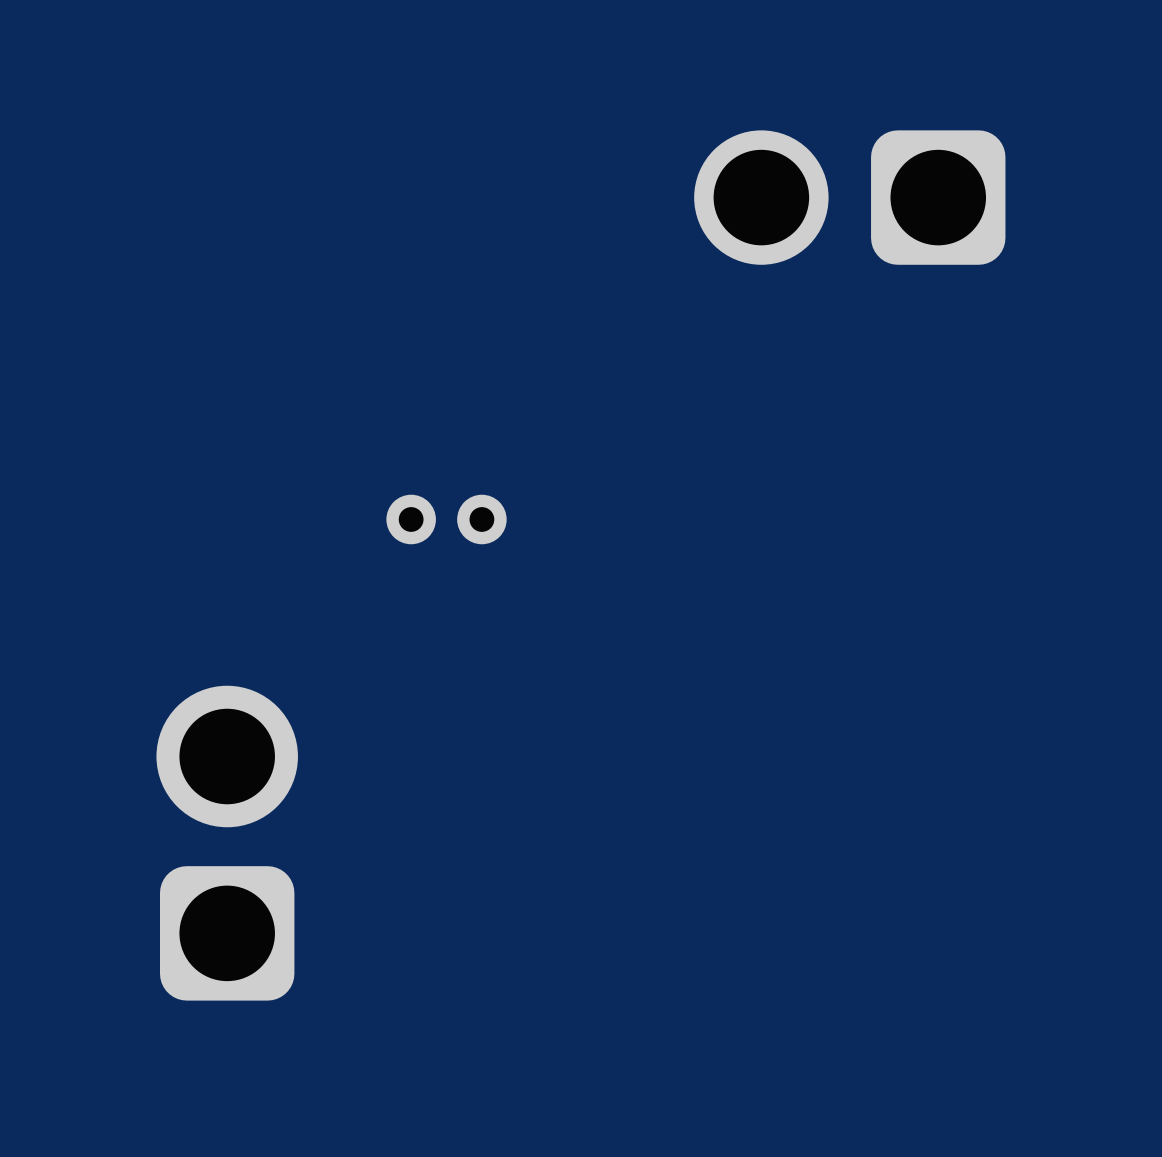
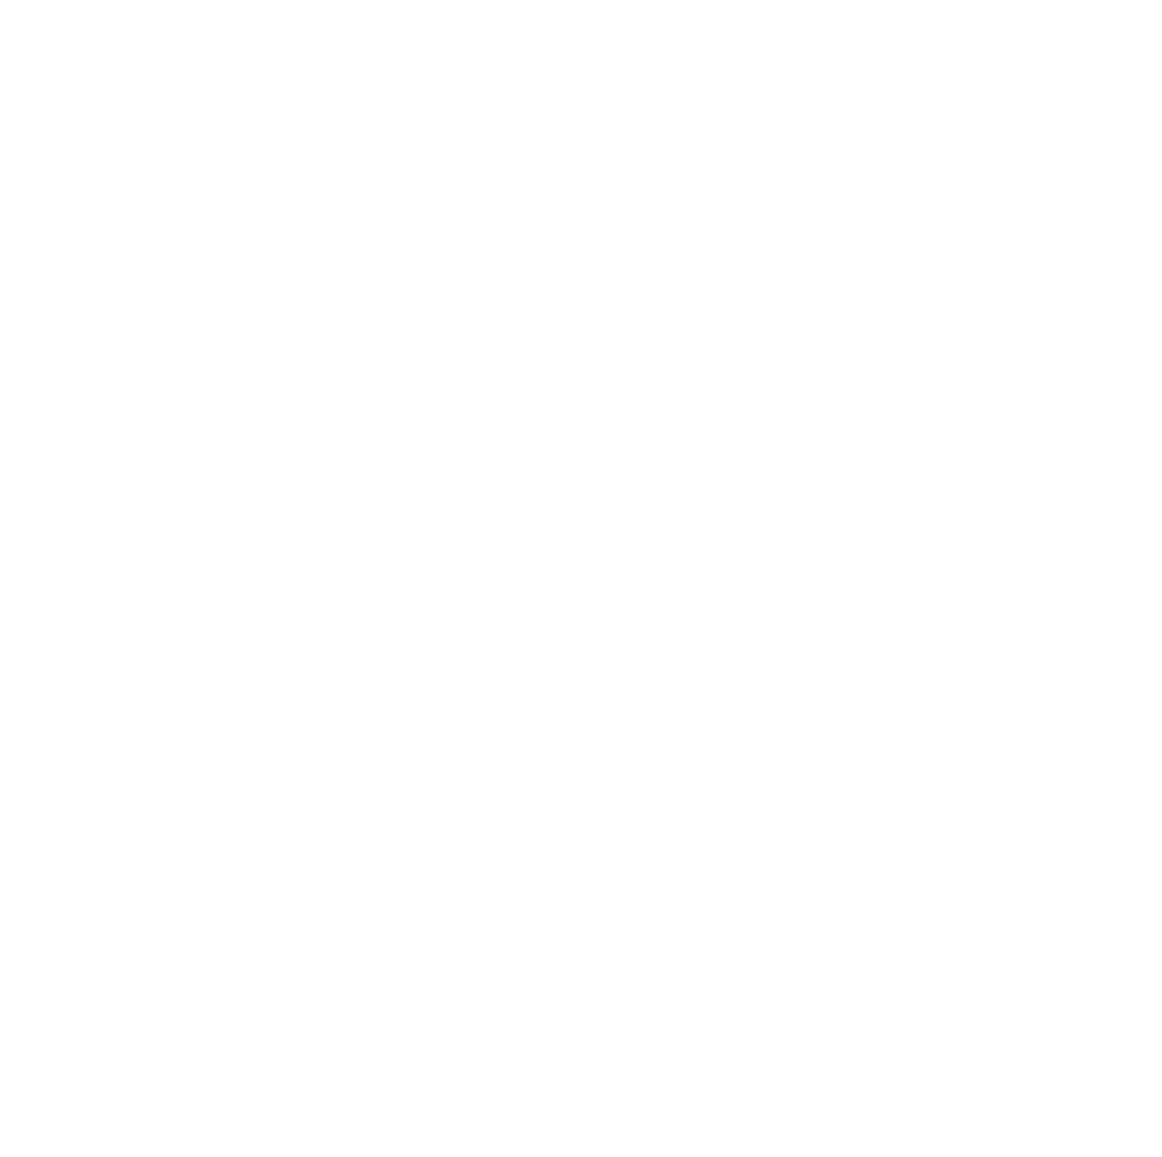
part: (849, 197) -> none
part: (446, 519) -> none
part: (227, 843) -> none

